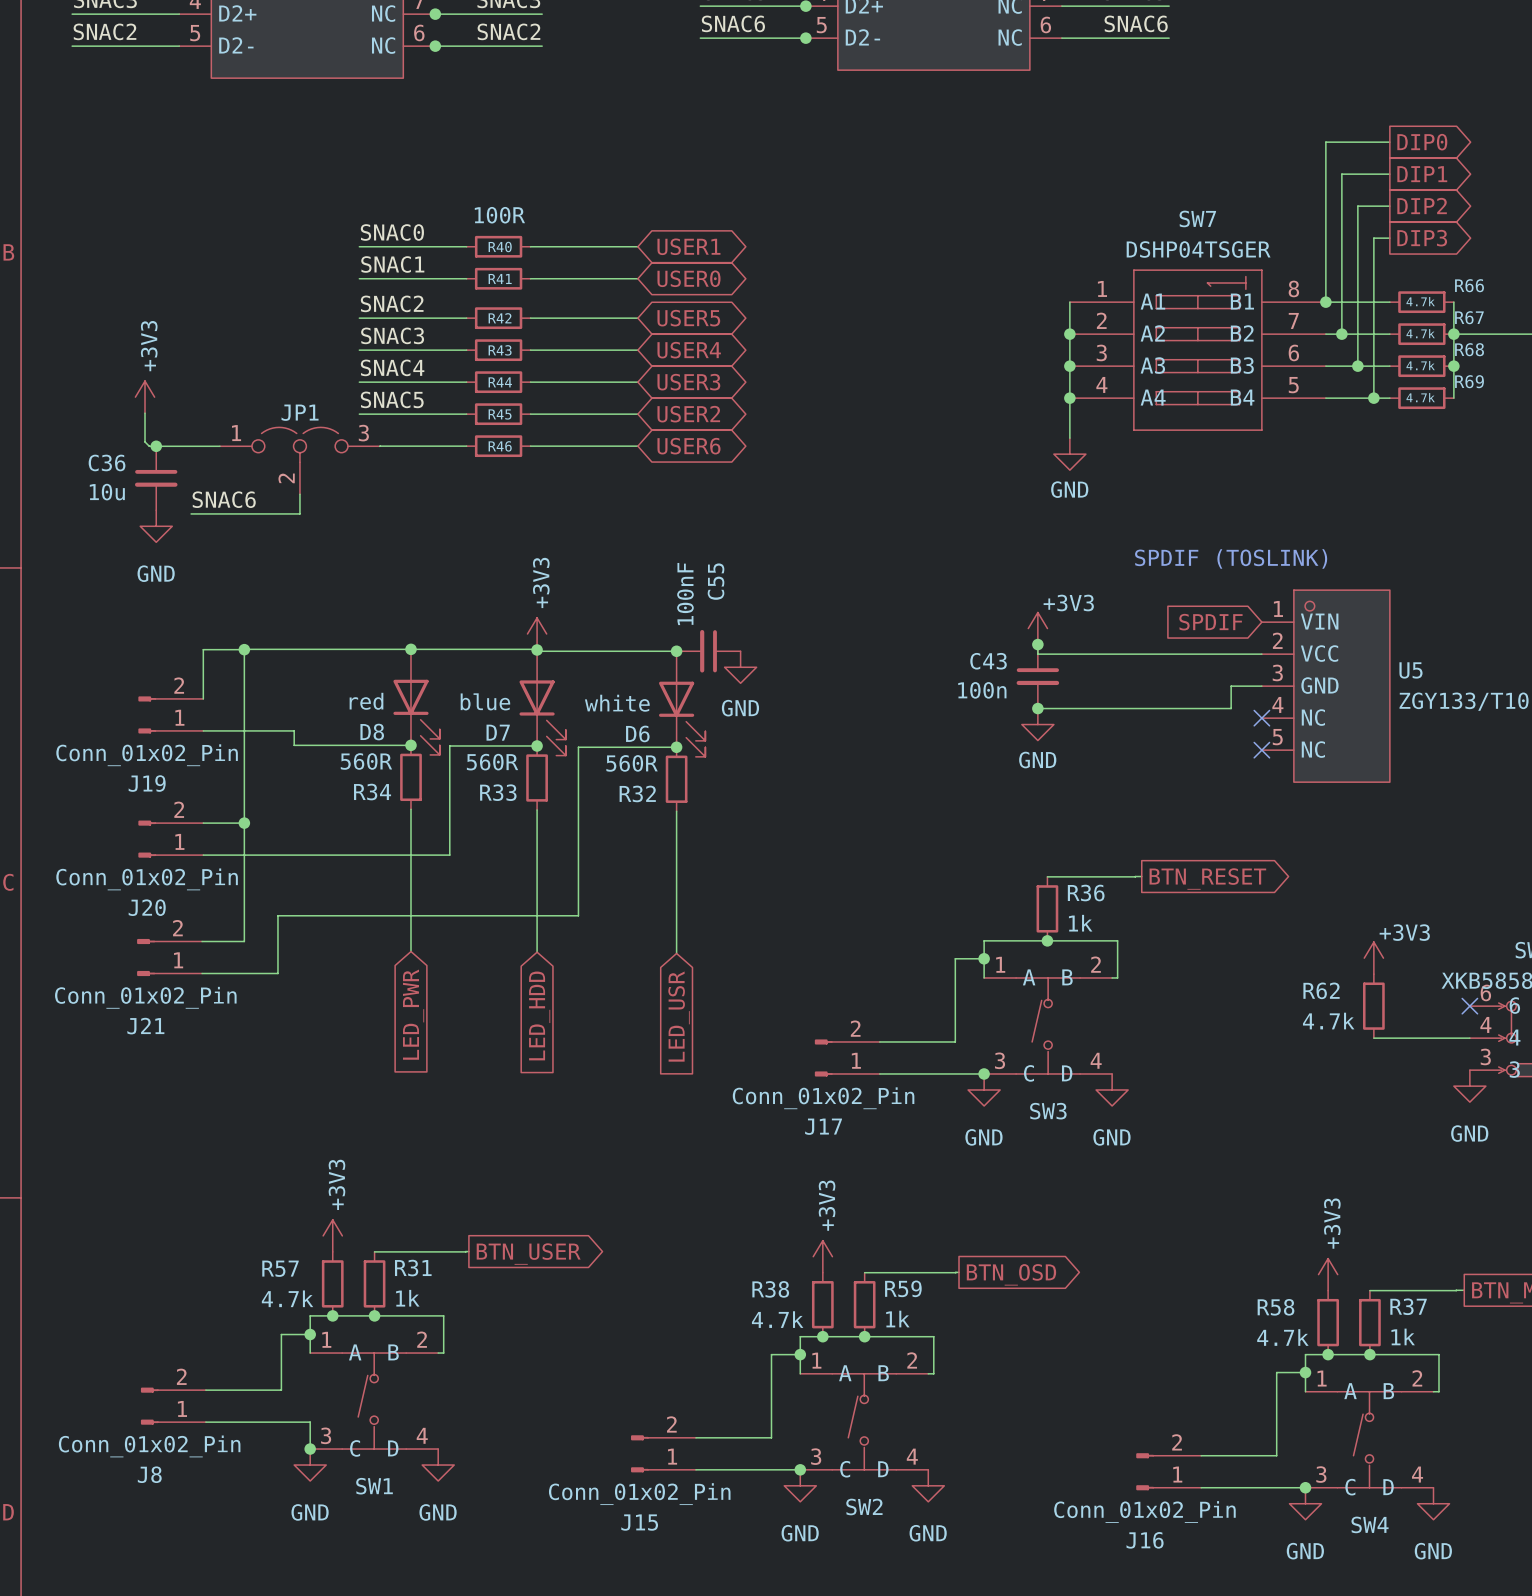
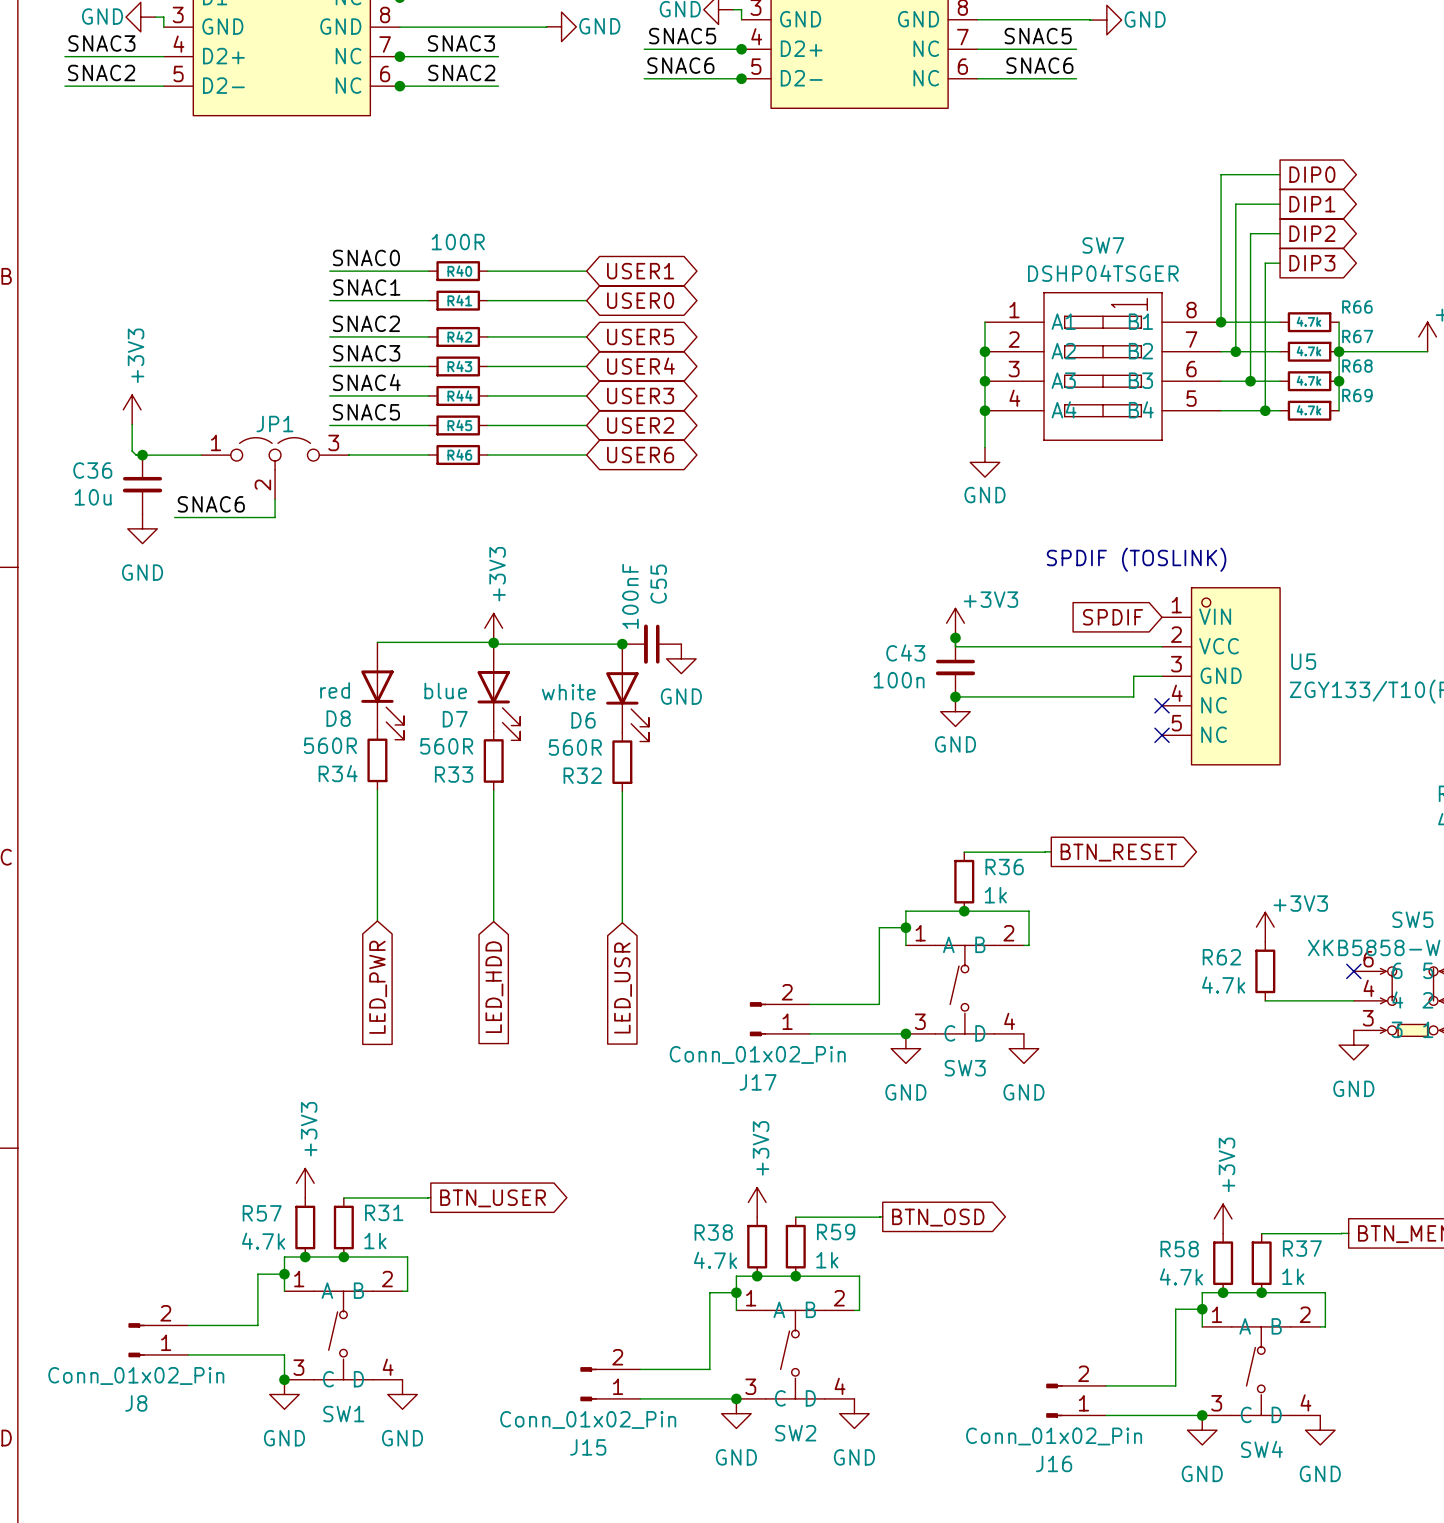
wire: (244, 649) (203, 649) (203, 698) -> none
junction: (244, 649) -> none
wire: (410, 649) (244, 649) (244, 941) (202, 941) -> none
junction: (410, 649) -> none
J19: Conn_01x02_Pin (170, 714) -> none
wire: (203, 730) (294, 730) (294, 745) (410, 745) -> none
junction: (410, 745) -> none
wire: (537, 745) (449, 745) (449, 855) (203, 855) -> none
junction: (537, 745) -> none
wire: (676, 747) (578, 747) (578, 915) (277, 915) (277, 973) (202, 973) -> none
junction: (676, 747) -> none
wire: (203, 823) (244, 823) -> none
junction: (244, 823) -> none
J20: Conn_01x02_Pin (170, 839) -> none
J21: Conn_01x02_Pin (169, 957) -> none

